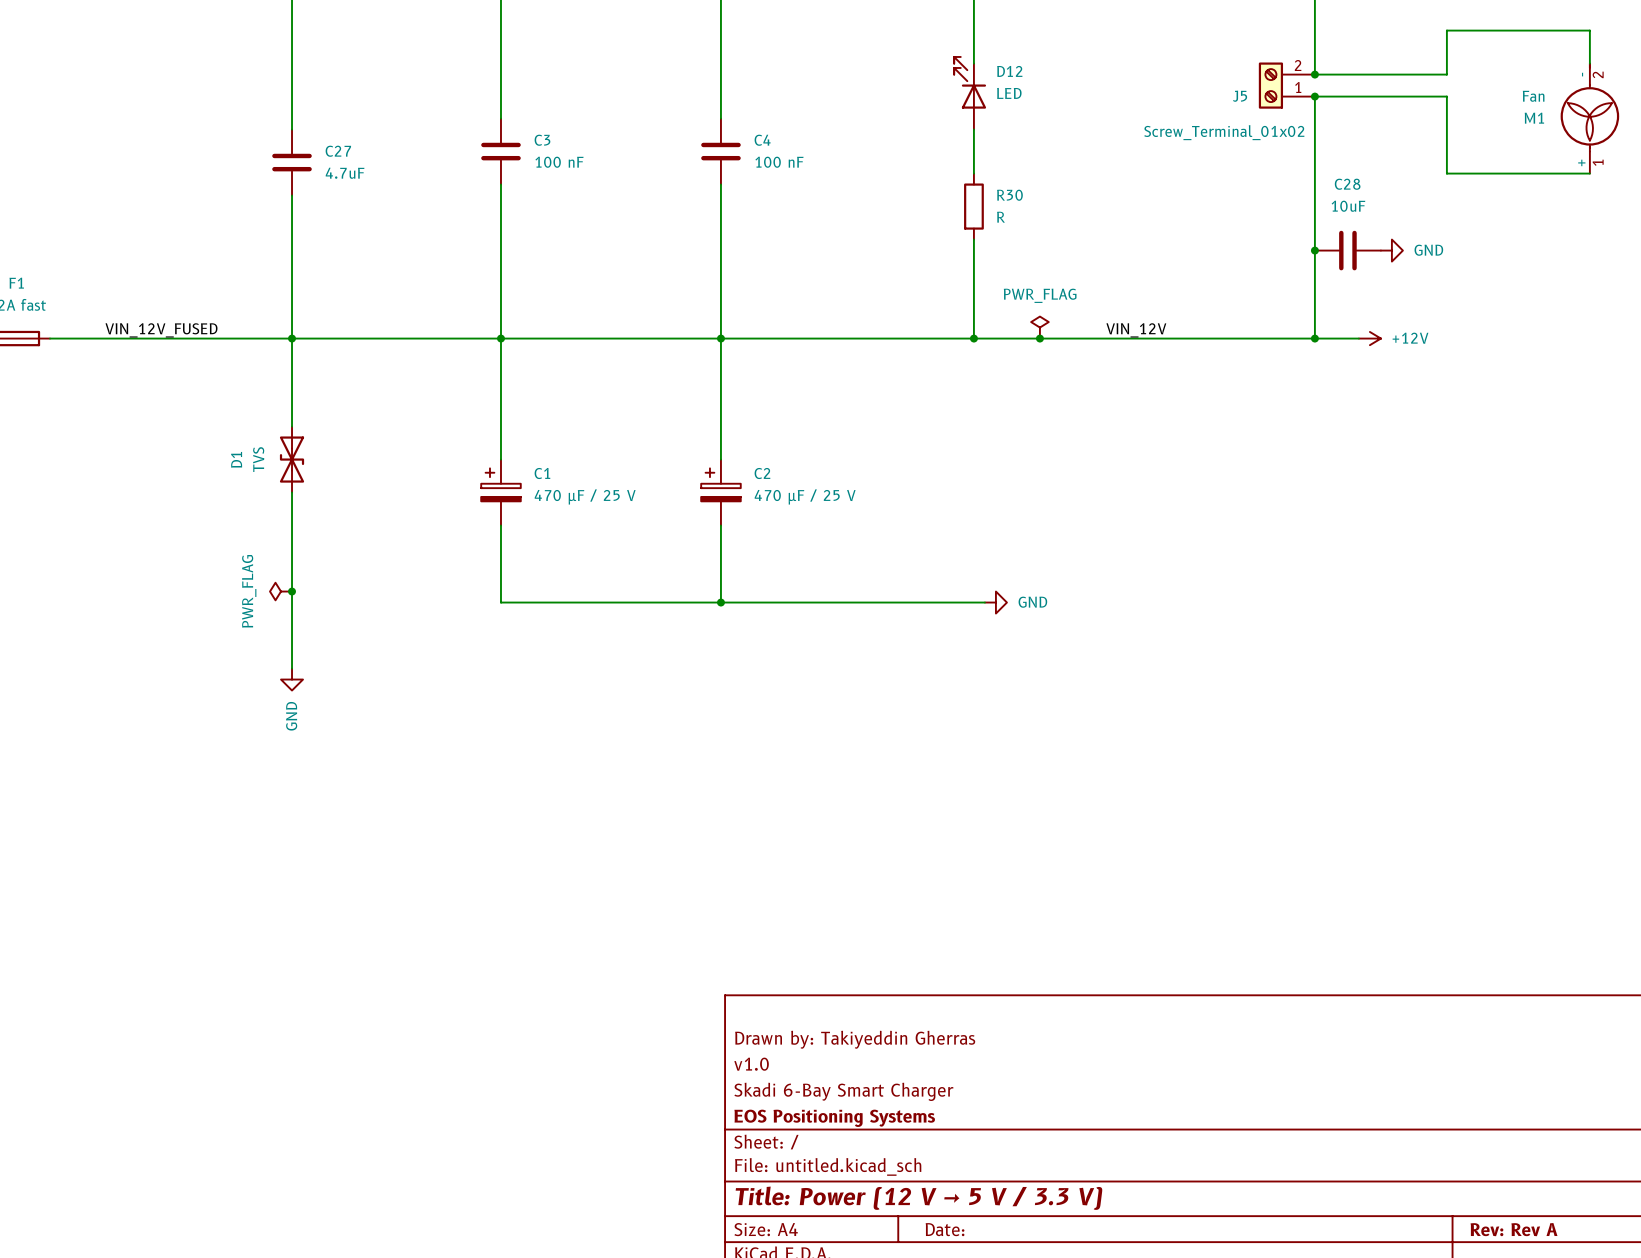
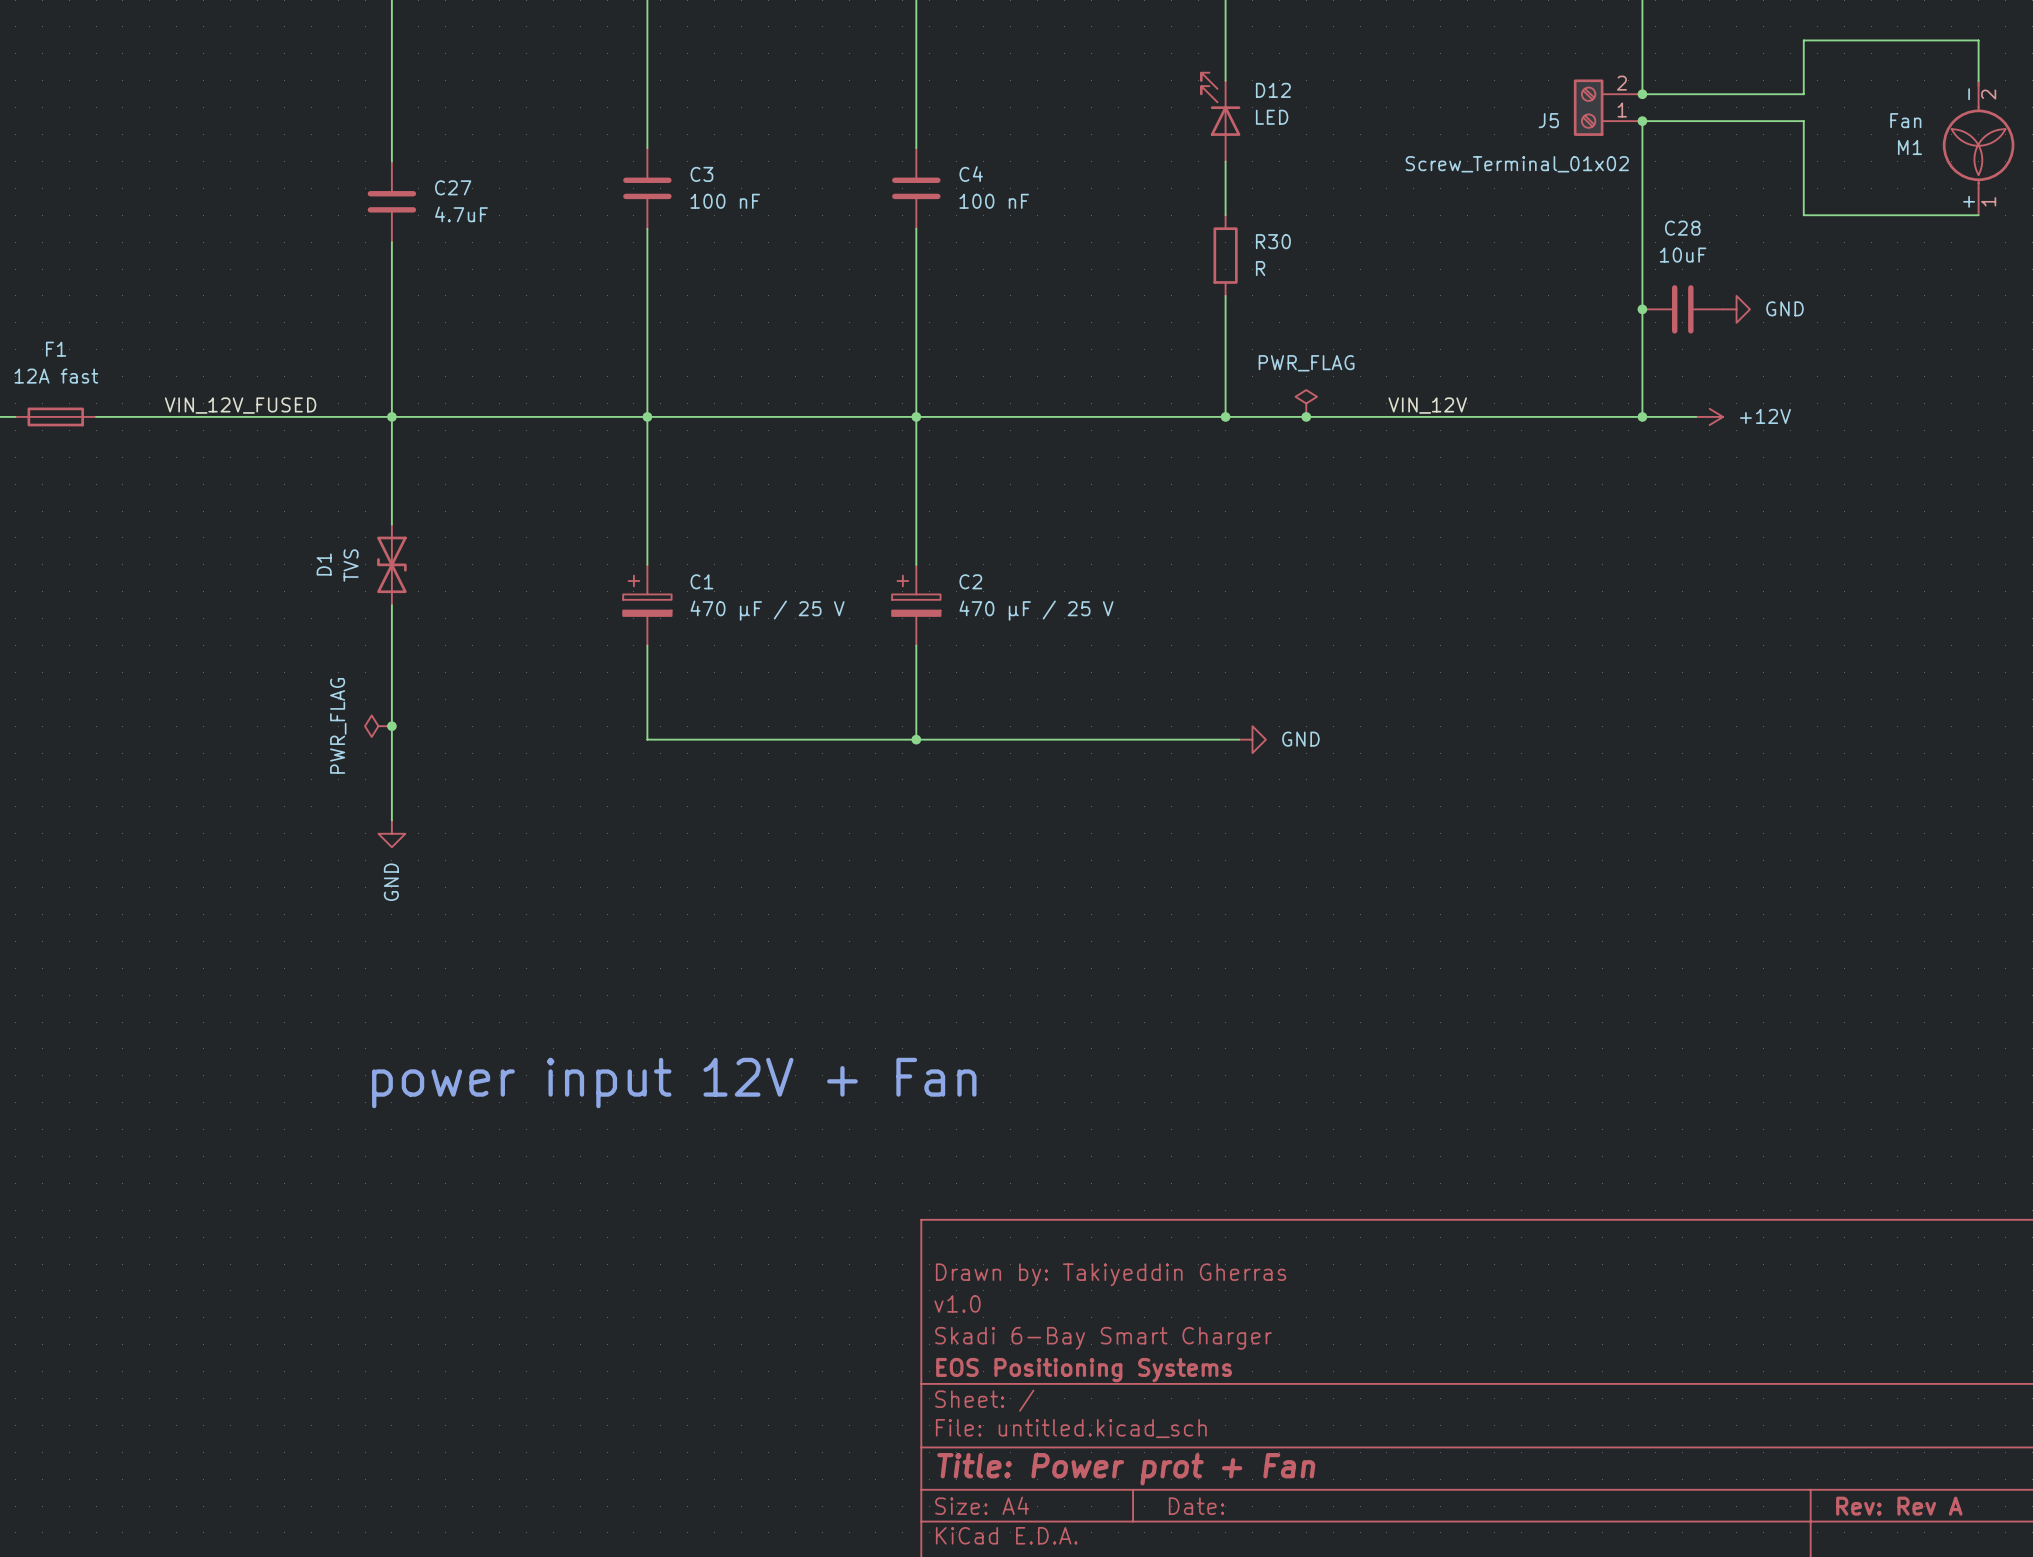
text: none -> power input 12V + Fan (674, 1083)
title block: Title: Power (12 V → 5 V / 3.3 V) (918, 1198) -> Title: Power prot + Fan (1126, 1469)

